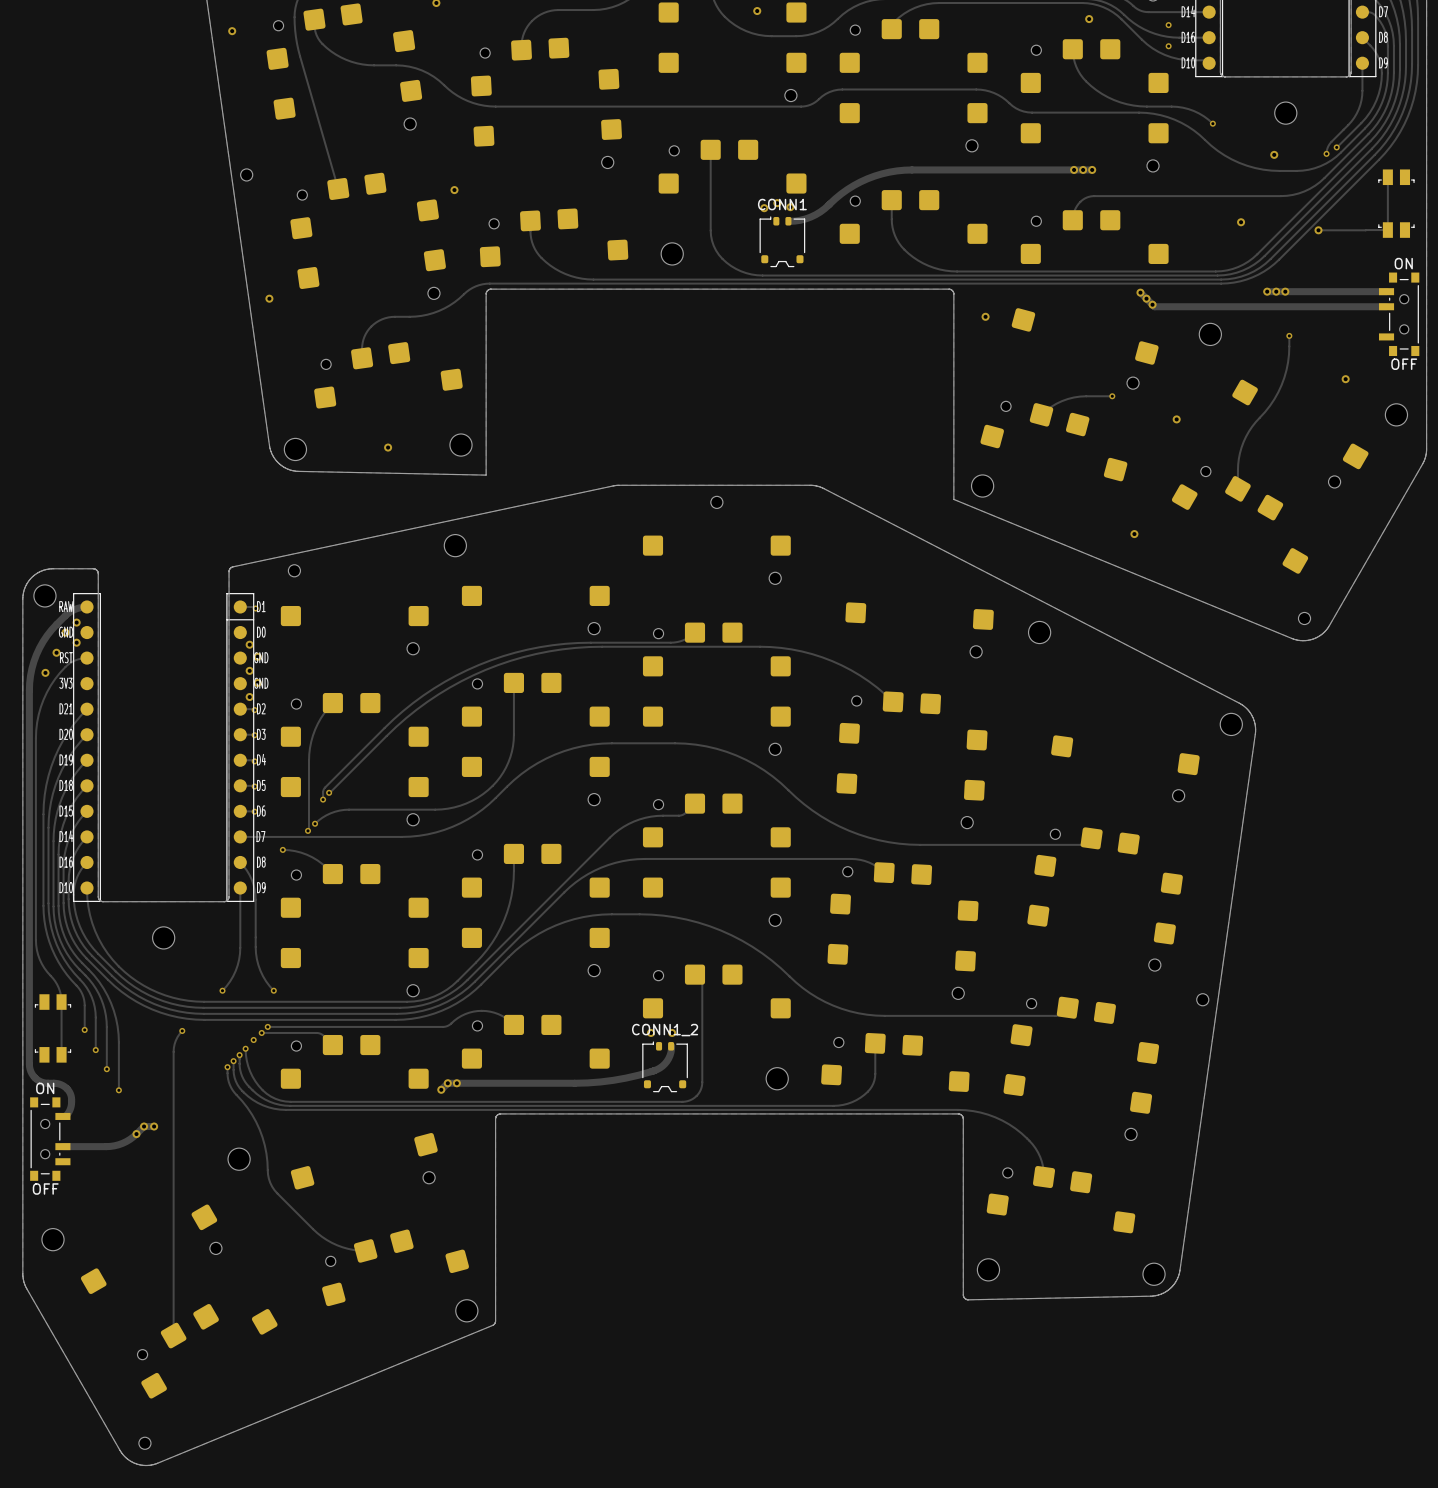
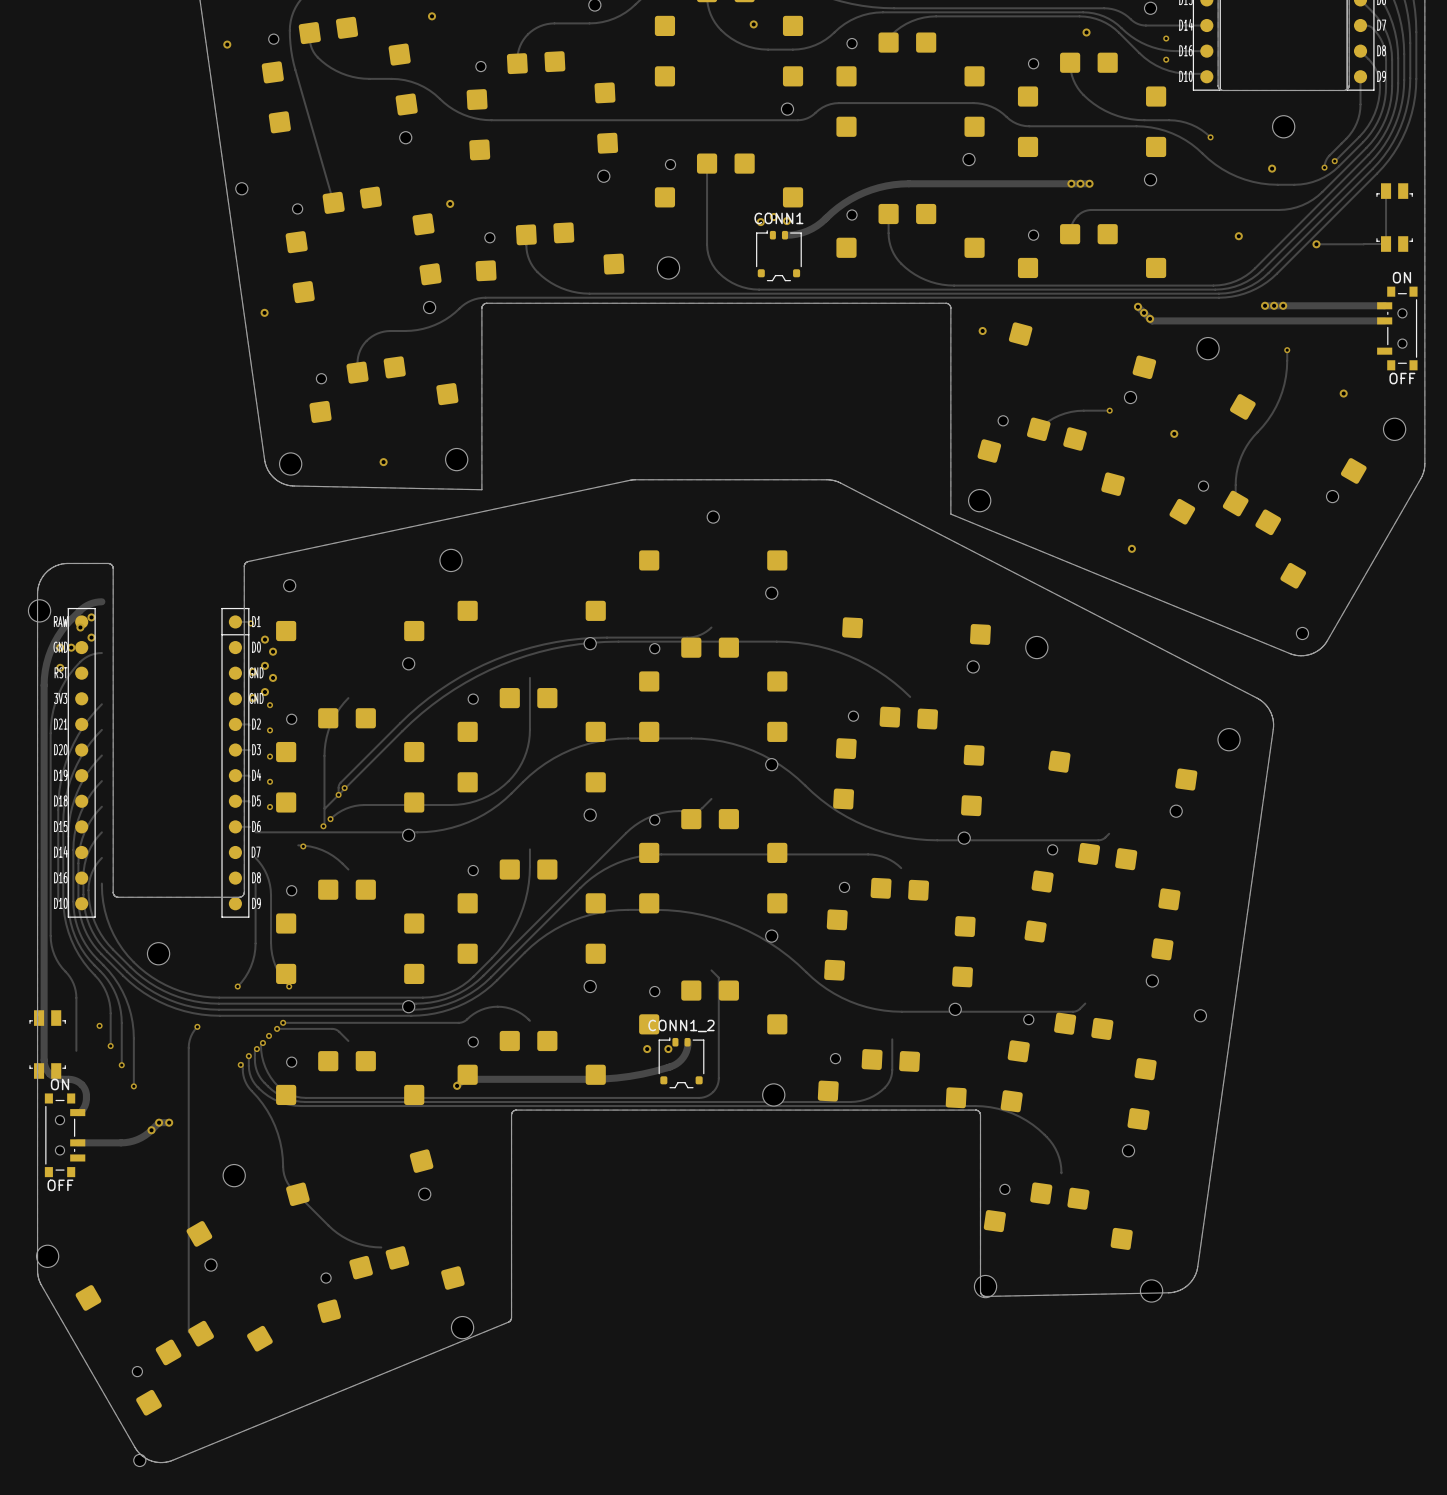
board edge: (617, 485) (230, 568) (229, 896) (225, 901) (103, 901) (99, 899) (98, 572) (93, 568) (48, 569) (35, 574) (26, 585) (22, 598) (23, 1278) (26, 1288) (120, 1450) (132, 1462) (143, 1465) (156, 1463) (493, 1324) (495, 1320) (495, 1118) (499, 1114) (959, 1114) (963, 1118) (963, 1294) (965, 1298) (1152, 1296) (1167, 1291) (1177, 1279) (1255, 734) (1254, 723) (1249, 712) (1239, 703) (820, 487) (810, 485) (617, 485) -> (634, 479) (245, 563) (244, 892) (240, 897) (118, 897) (114, 894) (113, 567) (108, 563) (63, 563) (50, 569) (40, 579) (37, 593) (37, 1274) (41, 1285) (134, 1447) (147, 1459) (159, 1462) (171, 1460) (509, 1321) (511, 1317) (511, 1114) (515, 1110) (976, 1110) (980, 1114) (980, 1291) (982, 1295) (1169, 1292) (1184, 1287) (1195, 1275) (1273, 729) (1272, 718) (1267, 707) (1257, 698) (837, 481) (826, 479) (634, 479)
via: none -> (91, 617)
track: (87, 606) (69, 612) (47, 635) (33, 661) (29, 683) (29, 1066) (31, 1073) (38, 1080) (59, 1084) (68, 1091) (71, 1105) (66, 1114) (62, 1116) -> (101, 601) (84, 607) (61, 630) (51, 649) (44, 678) (44, 1062) (46, 1069) (53, 1076) (74, 1080) (83, 1087) (86, 1102) (81, 1111) (77, 1112)
via: none -> (80, 627)
via: (76, 622) -> none
via: none -> (91, 637)
via: none -> (264, 639)
via: none -> (71, 647)
track: (694, 632) (686, 638) (674, 642) (565, 643) (527, 649) (503, 656) (479, 664) (444, 681) (413, 703) (384, 728) -> (711, 627) (703, 633) (690, 637) (581, 638) (543, 644) (506, 655) (471, 670) (439, 690) (409, 714) (379, 743)
via: none -> (273, 651)
via: (76, 642) -> none
via: (249, 644) -> none
via: none -> (264, 665)
via: (56, 652) -> none
via: none -> (60, 667)
track: (87, 658) (70, 663) (55, 679) (43, 699) (36, 730) (36, 945) (41, 963) (55, 981) (60, 994) (61, 1054) -> (101, 653) (84, 658) (69, 674) (55, 702) (50, 725) (50, 940) (56, 959) (70, 977) (75, 990) (76, 1050)
via: none -> (273, 677)
via: (249, 670) -> none
via: (45, 672) -> none
via: none -> (264, 692)
track: (513, 682) (513, 734) (511, 751) (500, 777) (483, 794) (460, 805) (441, 809) (339, 810) (326, 815) (315, 823) -> (529, 677) (529, 729) (527, 746) (516, 772) (498, 789) (476, 801) (457, 804) (355, 805) (341, 810) (330, 819)
via: none -> (270, 705)
via: (249, 697) -> none
track: (893, 701) (869, 681) (851, 670) (822, 657) (791, 649) (760, 646) (575, 647) (523, 657) (473, 675) (427, 701) (386, 736) -> (910, 696) (885, 676) (858, 660) (839, 652) (808, 644) (776, 641) (591, 642) (539, 652) (513, 660) (477, 676) (432, 704) (382, 751)
track: (332, 703) (317, 723) (310, 747) (308, 830) -> (348, 698) (333, 718) (325, 743) (323, 826)
track: (87, 709) (68, 731) (54, 757) (46, 785) (43, 814) (43, 905) (45, 927) (58, 962) (82, 994) (84, 1002) (84, 1029) -> none
via: (254, 710) -> none
via: none -> (270, 730)
track: (87, 734) (75, 747) (62, 769) (51, 802) (48, 827) (48, 903) (51, 928) (56, 944) (69, 966) (86, 987) (93, 1001) (95, 1017) (95, 1050) -> none
via: (254, 735) -> none
via: none -> (270, 756)
track: (87, 760) (68, 783) (55, 818) (53, 841) (53, 913) (55, 927) (63, 946) (74, 964) (92, 984) (103, 1004) (106, 1021) (106, 1069) -> (101, 755) (80, 785) (70, 814) (68, 836) (68, 909) (72, 929) (78, 942) (89, 960) (107, 979) (118, 1000) (121, 1017) (121, 1065)
via: (254, 761) -> none
via: none -> (270, 781)
track: (345, 767) (324, 788) (323, 799) -> (340, 782) (338, 794)
via: none -> (344, 788)
via: none -> (338, 794)
track: (87, 785) (69, 810) (61, 831) (58, 854) (58, 912) (67, 942) (77, 958) (99, 981) (113, 1010) (118, 1034) (118, 1090) -> (101, 781) (87, 799) (76, 827) (73, 849) (73, 907) (82, 938) (92, 954) (114, 977) (128, 1006) (133, 1030) (133, 1086)
via: (254, 786) -> none
via: none -> (270, 807)
via: (329, 792) -> none
via: (323, 799) -> none
via: none -> (330, 819)
track: (694, 803) (681, 815) (651, 816) (634, 821) (609, 837) -> (711, 798) (698, 810) (667, 811) (645, 819) (630, 829) (605, 853)
via: none -> (323, 826)
track: (87, 811) (69, 837) (63, 867) -> (101, 704) (78, 735) (63, 771) (58, 799) (58, 883)
via: (254, 811) -> none
via: (315, 823) -> none
track: (87, 836) (73, 857) (68, 881) -> (101, 729) (85, 749) (76, 764) (65, 797) (63, 823) (63, 897)
track: (240, 836) (401, 836) (427, 834) (452, 826) (468, 819) (489, 803) (529, 768) (564, 751) (602, 743) (674, 743) (706, 746) (746, 759) (772, 776) (821, 816) (848, 830) (878, 840) (920, 844) (1080, 844) (1091, 838) -> (255, 832) (417, 832) (443, 829) (468, 822) (484, 814) (505, 799) (545, 763) (580, 746) (618, 738) (691, 738) (733, 743) (762, 755) (789, 771) (820, 799) (837, 811) (865, 826) (895, 835) (937, 840) (1098, 840) (1109, 833)
track: (282, 849) (301, 852) (312, 857) (332, 874) -> (298, 845) (316, 848) (327, 852) (348, 869)
via: (282, 849) -> none
track: (513, 853) (513, 879) (509, 904) (500, 928) (492, 942) (481, 956) (452, 985) (434, 996) (414, 1001) (204, 1001) (180, 999) (165, 995) (150, 989) (130, 976) (107, 953) (92, 923) (87, 888) -> (529, 849) (529, 874) (525, 900) (520, 916) (508, 938) (497, 952) (468, 981) (450, 992) (429, 997) (219, 997) (203, 996) (180, 991) (165, 985) (145, 972) (122, 949) (107, 918) (101, 883)
track: (87, 862) (77, 877) (73, 894) (75, 914) (85, 938) (98, 953) (127, 982) (148, 995) (171, 1003) (203, 1007) (415, 1006) (436, 1000) (450, 993) (462, 985) (487, 959) -> (101, 857) (91, 872) (88, 885) (90, 909) (97, 928) (108, 944) (136, 972) (156, 986) (178, 997) (194, 1001) (218, 1003) (423, 1003) (445, 999) (459, 993) (483, 975)
track: (240, 862) (249, 874) (254, 889) (255, 947) (258, 964) (266, 981) (273, 990) -> (255, 857) (264, 870) (270, 884) (271, 942) (273, 960) (278, 971) (289, 986)
track: (884, 872) (869, 862) (855, 859) (637, 859) (615, 862) (594, 870) (564, 892) -> (901, 868) (886, 857) (872, 854) (646, 855) (624, 860) (604, 869) (585, 882) (560, 908)
track: (68, 883) (68, 905) (72, 923) (87, 951) (118, 981) (131, 991) (154, 1003) (178, 1011) (203, 1013) (414, 1012) (431, 1008) (454, 997) (468, 987) (495, 961) -> (101, 832) (88, 852) (83, 870) (83, 901) (89, 925) (102, 946) (133, 977) (153, 992) (177, 1002) (202, 1008) (219, 1009) (421, 1009) (455, 1001) (470, 993) (490, 977)
track: none -> (63, 898) (66, 924) (71, 940) (83, 962) (101, 983) (108, 997) (110, 1013) (110, 1046)
track: (63, 885) (65, 921) (72, 938) (82, 953) (114, 986) (128, 996) (152, 1009) (178, 1017) (204, 1019) (411, 1018) (434, 1013) (456, 1003) (475, 989) (501, 964) -> (101, 806) (87, 827) (79, 850) (78, 904) (82, 922) (93, 944) (123, 975) (143, 992) (167, 1005) (184, 1011) (210, 1015) (419, 1015) (442, 1011) (465, 1003) (478, 995) (497, 980)
track: (240, 888) (239, 959) (233, 976) (222, 990) -> (255, 883) (254, 955) (248, 972) (237, 986)
track: (508, 956) (538, 933) (574, 919) (602, 914) (663, 915) (698, 922) (731, 935) (762, 953) (802, 988) (817, 997) (841, 1008) (858, 1013) (884, 1015) (1055, 1015) (1061, 1014) (1067, 1007) -> (504, 972) (539, 940) (572, 921) (608, 911) (667, 910) (714, 918) (748, 930) (779, 949) (819, 983) (834, 993) (858, 1004) (875, 1009) (901, 1011) (1072, 1011) (1078, 1010) (1085, 1003)
via: none -> (237, 986)
via: none -> (289, 986)
track: (694, 974) (702, 981) (702, 1084) (696, 1095) (685, 1101) (285, 1101) (270, 1096) (258, 1086) (248, 1065) (245, 1048) -> (711, 970) (718, 977) (718, 1080) (713, 1092) (701, 1097) (300, 1097) (286, 1092) (274, 1082) (263, 1062) (260, 1044)
via: (222, 990) -> none
via: (273, 990) -> none
via: none -> (283, 1022)
via: none -> (99, 1025)
via: none -> (197, 1026)
via: none -> (277, 1028)
via: none -> (269, 1035)
track: (513, 1024) (498, 1014) (481, 1010) (465, 1014) (444, 1026) (267, 1026) -> (529, 1020) (514, 1010) (497, 1006) (481, 1009) (459, 1022) (283, 1022)
via: (84, 1029) -> none
via: none -> (110, 1046)
track: (182, 1030) (175, 1040) (173, 1051) (173, 1335) -> (197, 1026) (190, 1036) (188, 1047) (188, 1332)
via: (182, 1030) -> none
track: (261, 1032) (318, 1033) (332, 1045) -> (277, 1028) (334, 1029) (348, 1040)
track: (875, 1043) (875, 1077) (871, 1086) (856, 1100) (833, 1105) (285, 1105) (265, 1099) (247, 1084) (241, 1073) (239, 1055) -> (892, 1039) (892, 1073) (888, 1082) (873, 1096) (850, 1101) (300, 1101) (280, 1095) (262, 1080) (256, 1069) (254, 1051)
track: (671, 1046) (668, 1058) (659, 1068) (626, 1078) (587, 1082) (447, 1083) (441, 1089) -> (688, 1042) (685, 1054) (676, 1064) (642, 1074) (603, 1078) (463, 1079) (457, 1085)
via: none -> (121, 1065)
via: (95, 1050) -> none
via: (239, 1055) -> none
track: (233, 1061) (234, 1077) (242, 1091) (257, 1102) (280, 1109) (973, 1111) (1002, 1120) (1027, 1138) (1040, 1157) (1044, 1177) -> (248, 1057) (249, 1073) (257, 1087) (273, 1098) (295, 1105) (990, 1107) (1019, 1116) (1044, 1134) (1057, 1153) (1061, 1173)
via: (233, 1061) -> none
CONN1_2 position: (665, 1066) -> (681, 1062)
track: (227, 1067) (228, 1079) (231, 1087) (247, 1107) (259, 1129) (266, 1153) (268, 1178) (274, 1190) (313, 1229) (326, 1240) (348, 1248) (365, 1250) -> (242, 1063) (243, 1075) (246, 1083) (262, 1103) (274, 1125) (281, 1149) (284, 1175) (289, 1186) (328, 1225) (342, 1236) (363, 1245) (381, 1247)
via: (227, 1067) -> none
via: (106, 1069) -> none
via: none -> (457, 1085)
via: none -> (133, 1086)
via: (447, 1083) -> none
via: (456, 1083) -> none
via: (441, 1089) -> none
via: (118, 1090) -> none
via: none -> (159, 1122)
via: none -> (169, 1122)
via: none -> (151, 1130)
via: (144, 1126) -> none
track: (154, 1126) (144, 1126) (130, 1139) (114, 1145) (62, 1146) -> (169, 1122) (159, 1122) (144, 1135) (129, 1142) (77, 1142)
via: (154, 1126) -> none
via: (136, 1134) -> none
part position: (50, 1139) -> (65, 1135)

